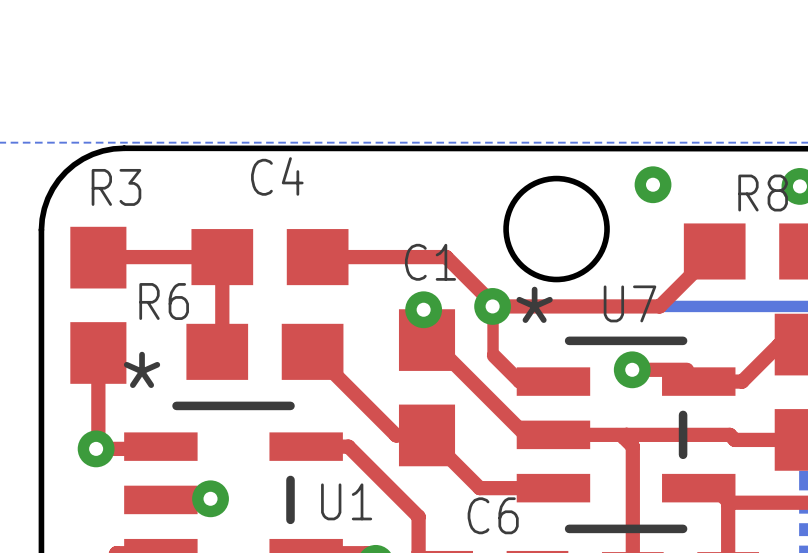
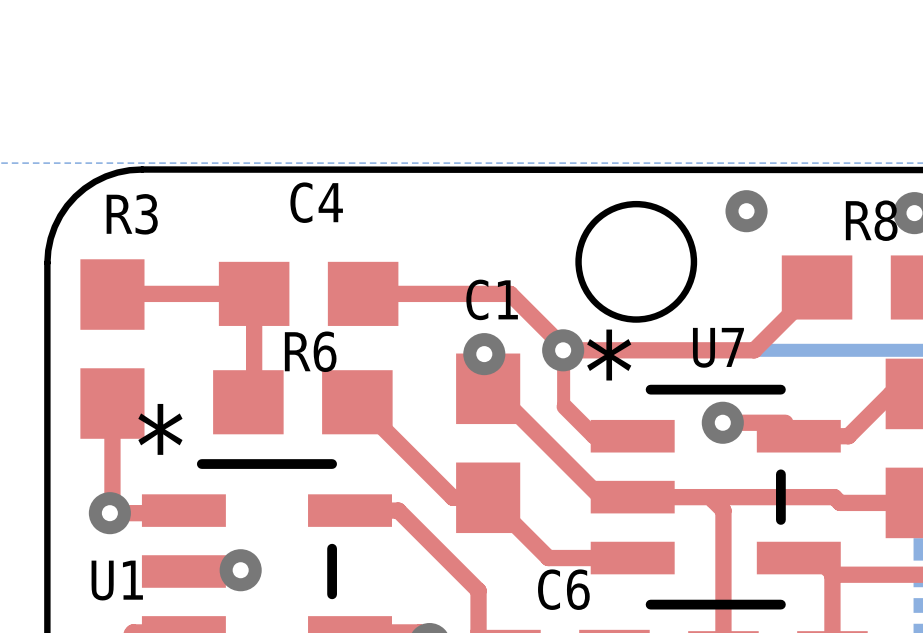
R6 name position: R6 (164, 301) -> R6 (310, 351)
U1 name position: U1 (346, 501) -> U1 (117, 580)

